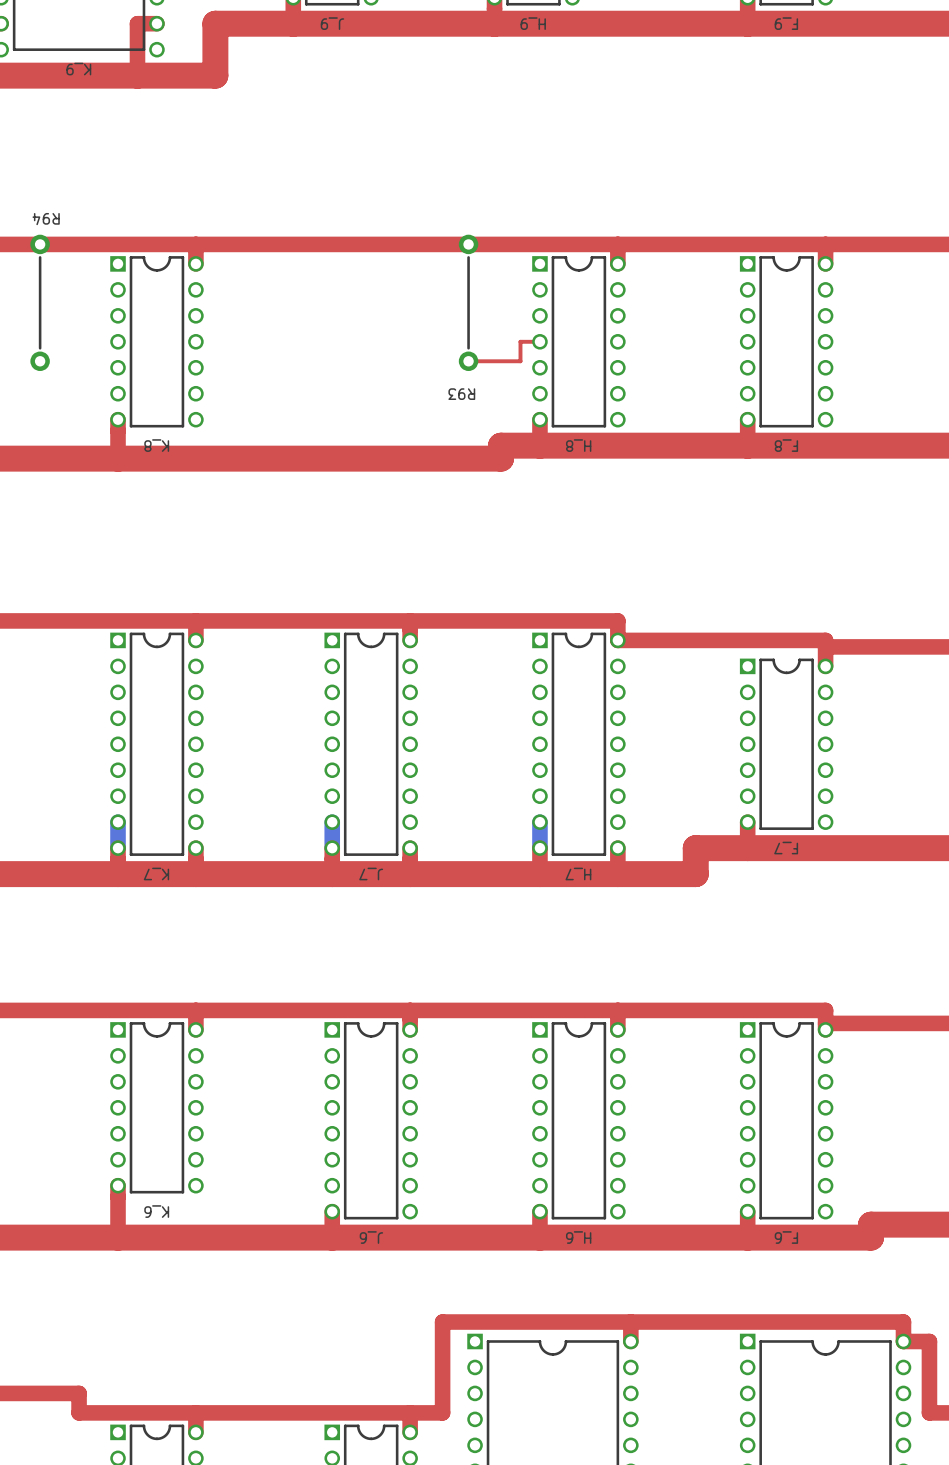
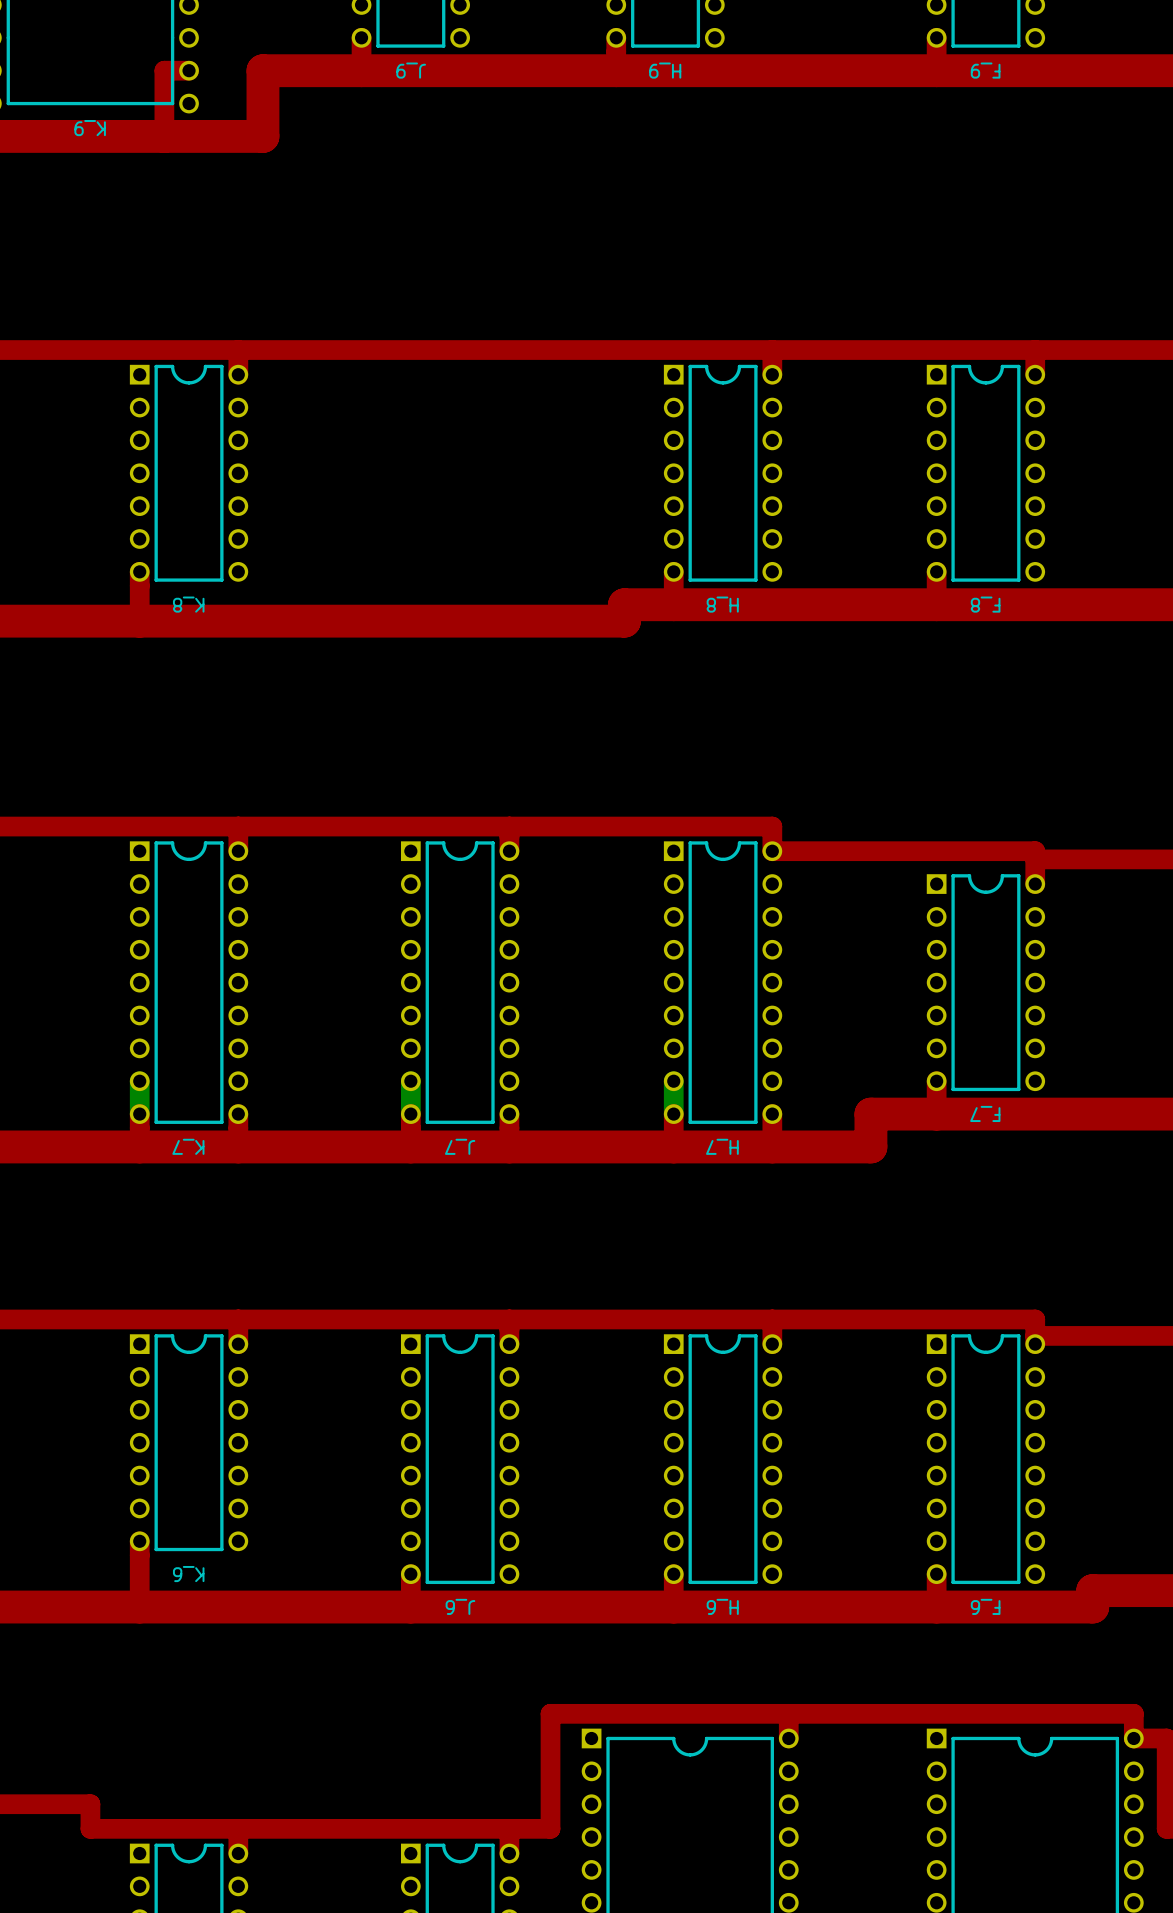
R94: (40, 302) -> none
R93: (468, 302) -> none
top track: (539, 341) (520, 341) (520, 361) (468, 361) -> none

